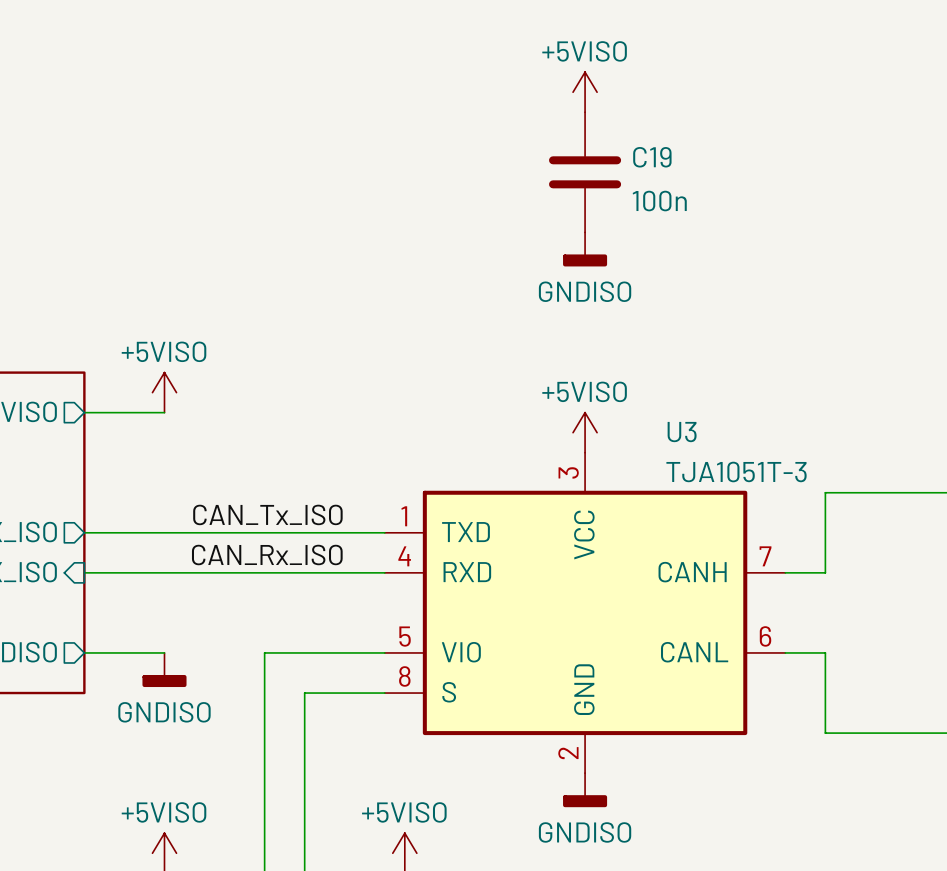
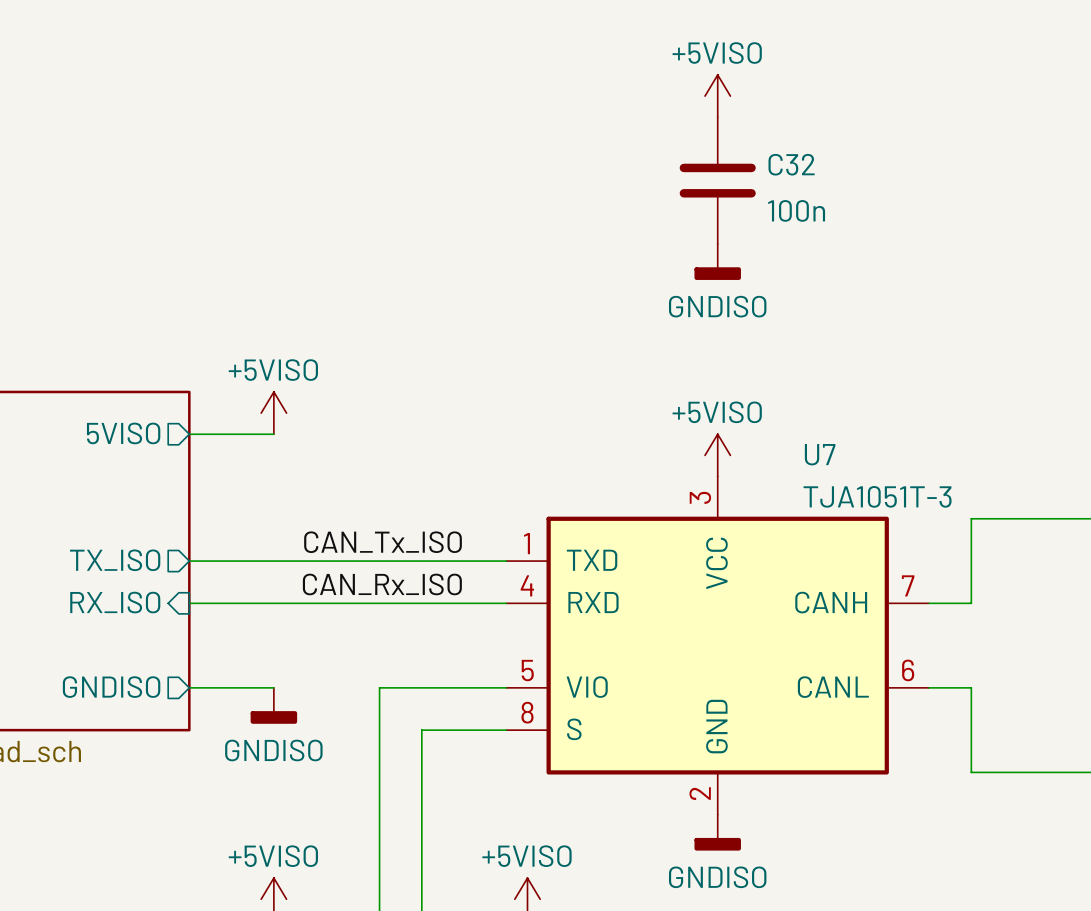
C19 name: C19 (652, 157) -> C32 (791, 164)
U3 name: U3 (682, 432) -> U7 (820, 454)

